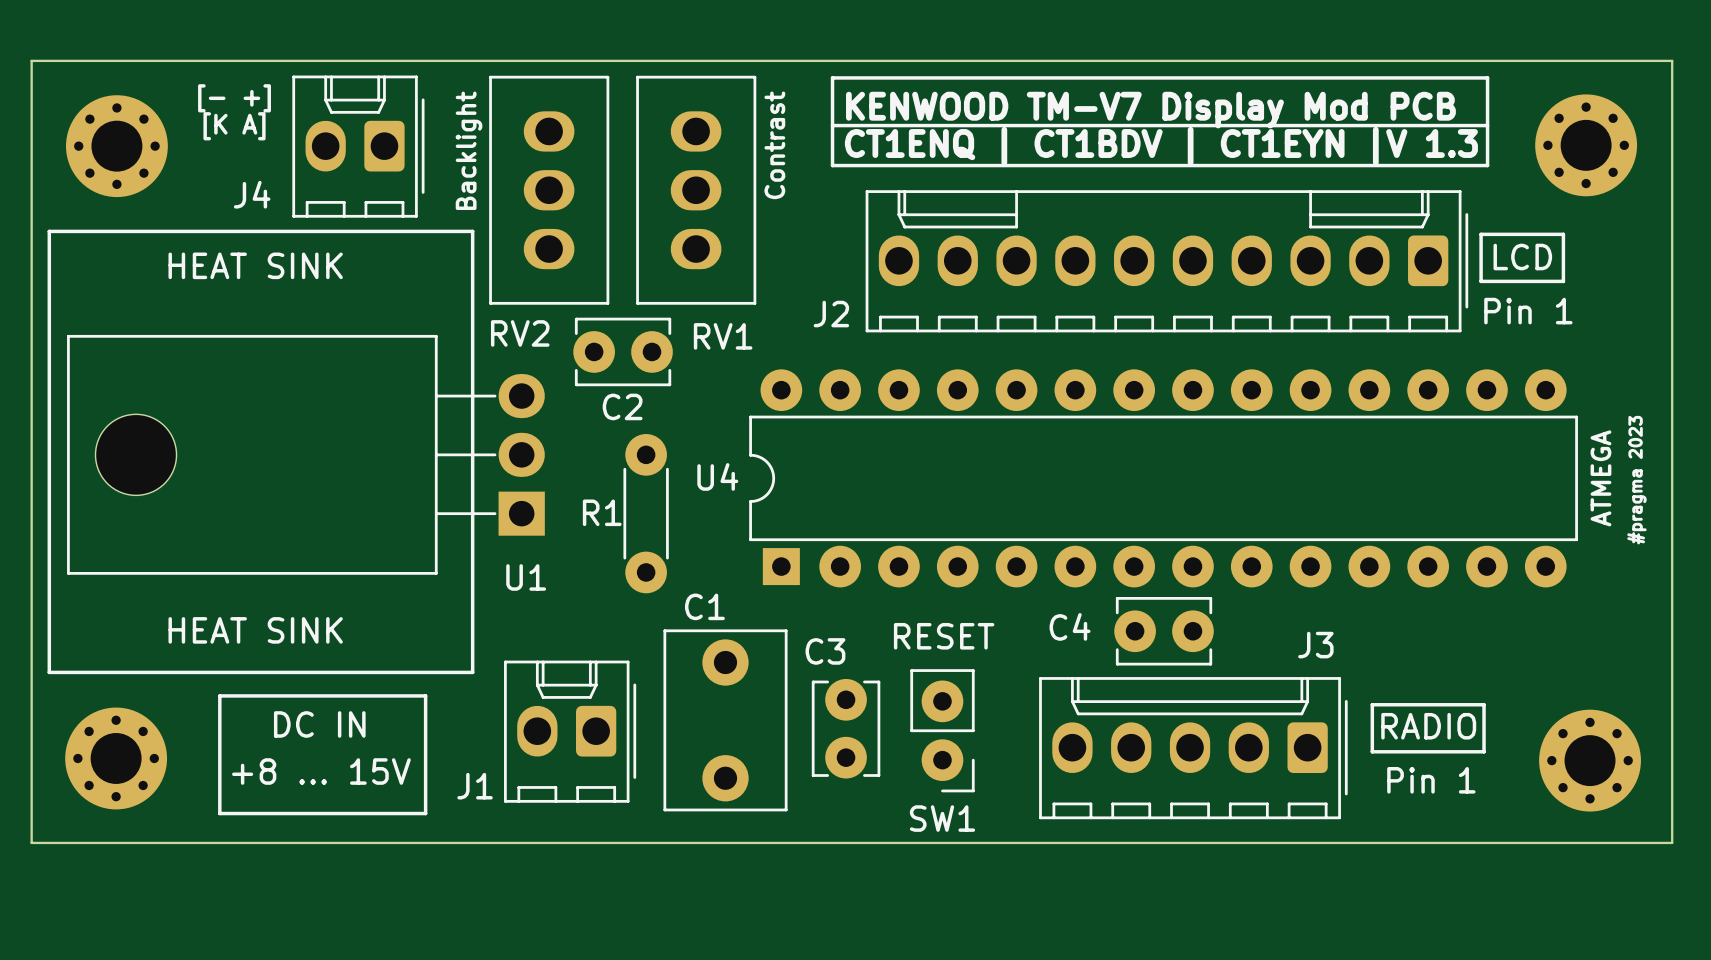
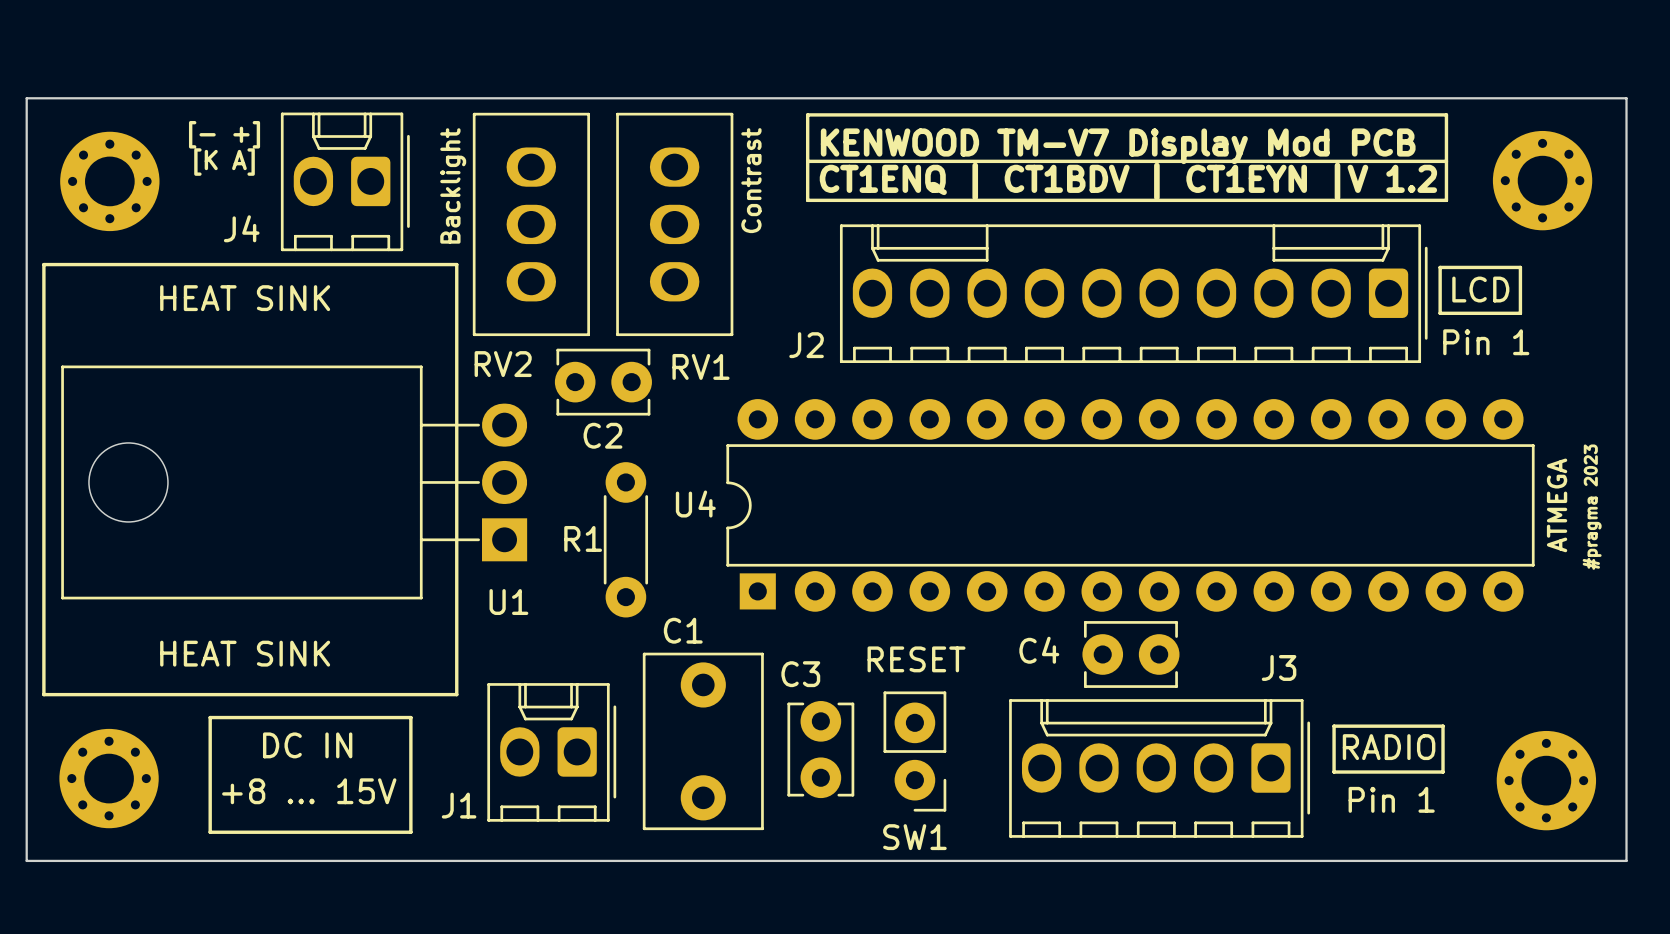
text: CT1ENQ | CT1BDV | CT1EYN |V 1.3 (1161, 146) -> CT1ENQ | CT1BDV | CT1EYN |V 1.2 (1128, 181)

